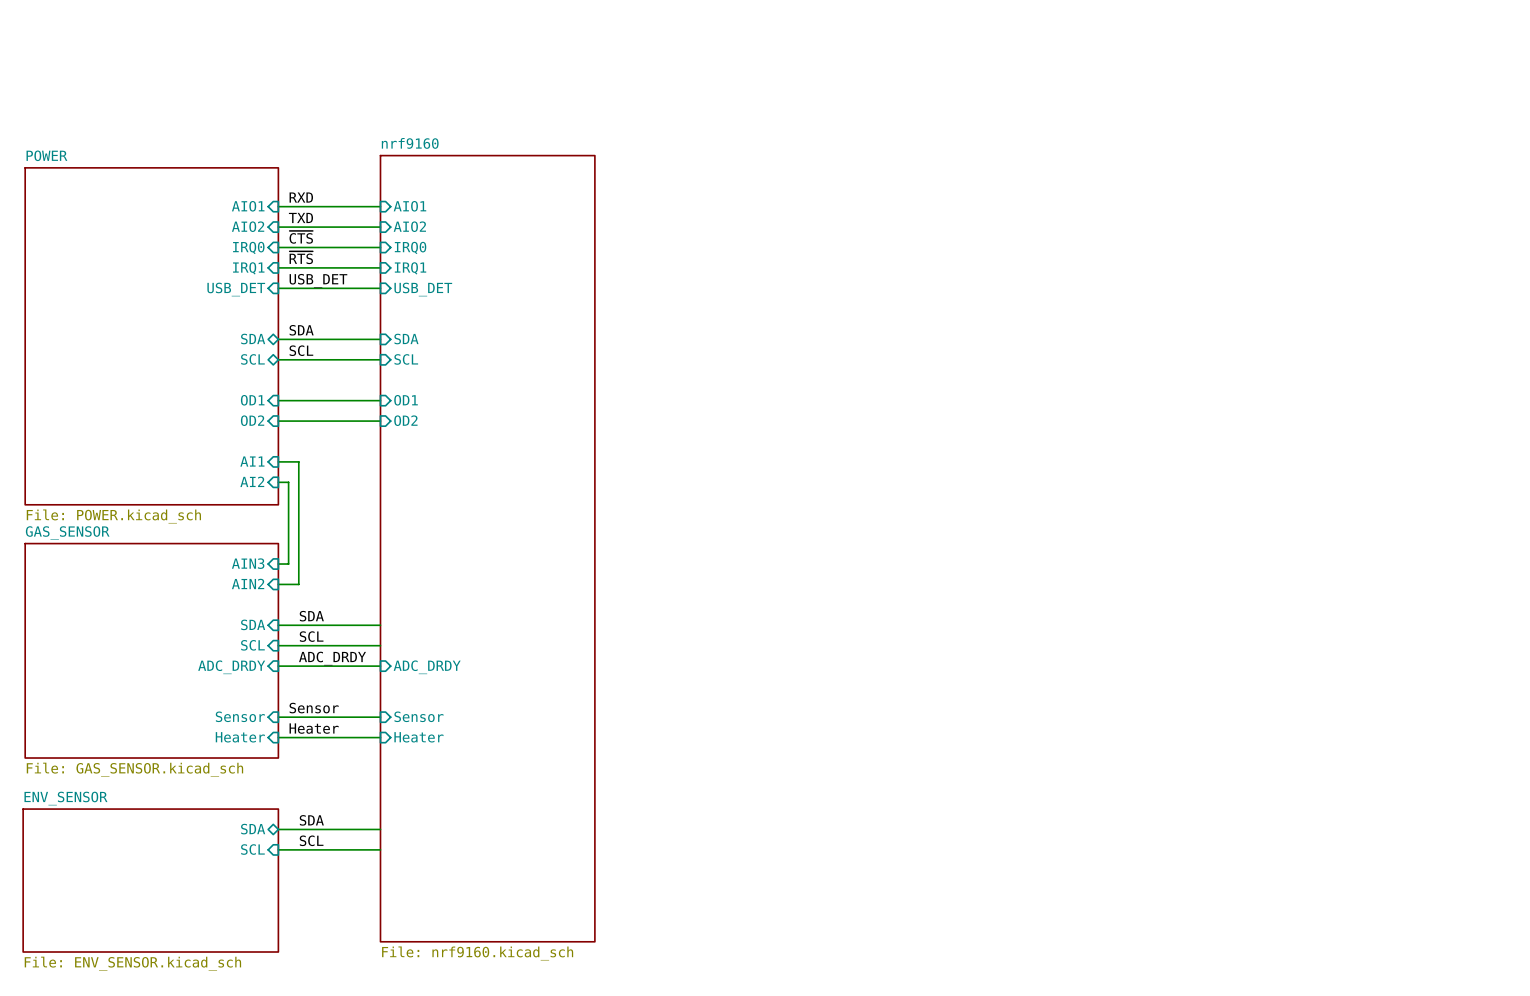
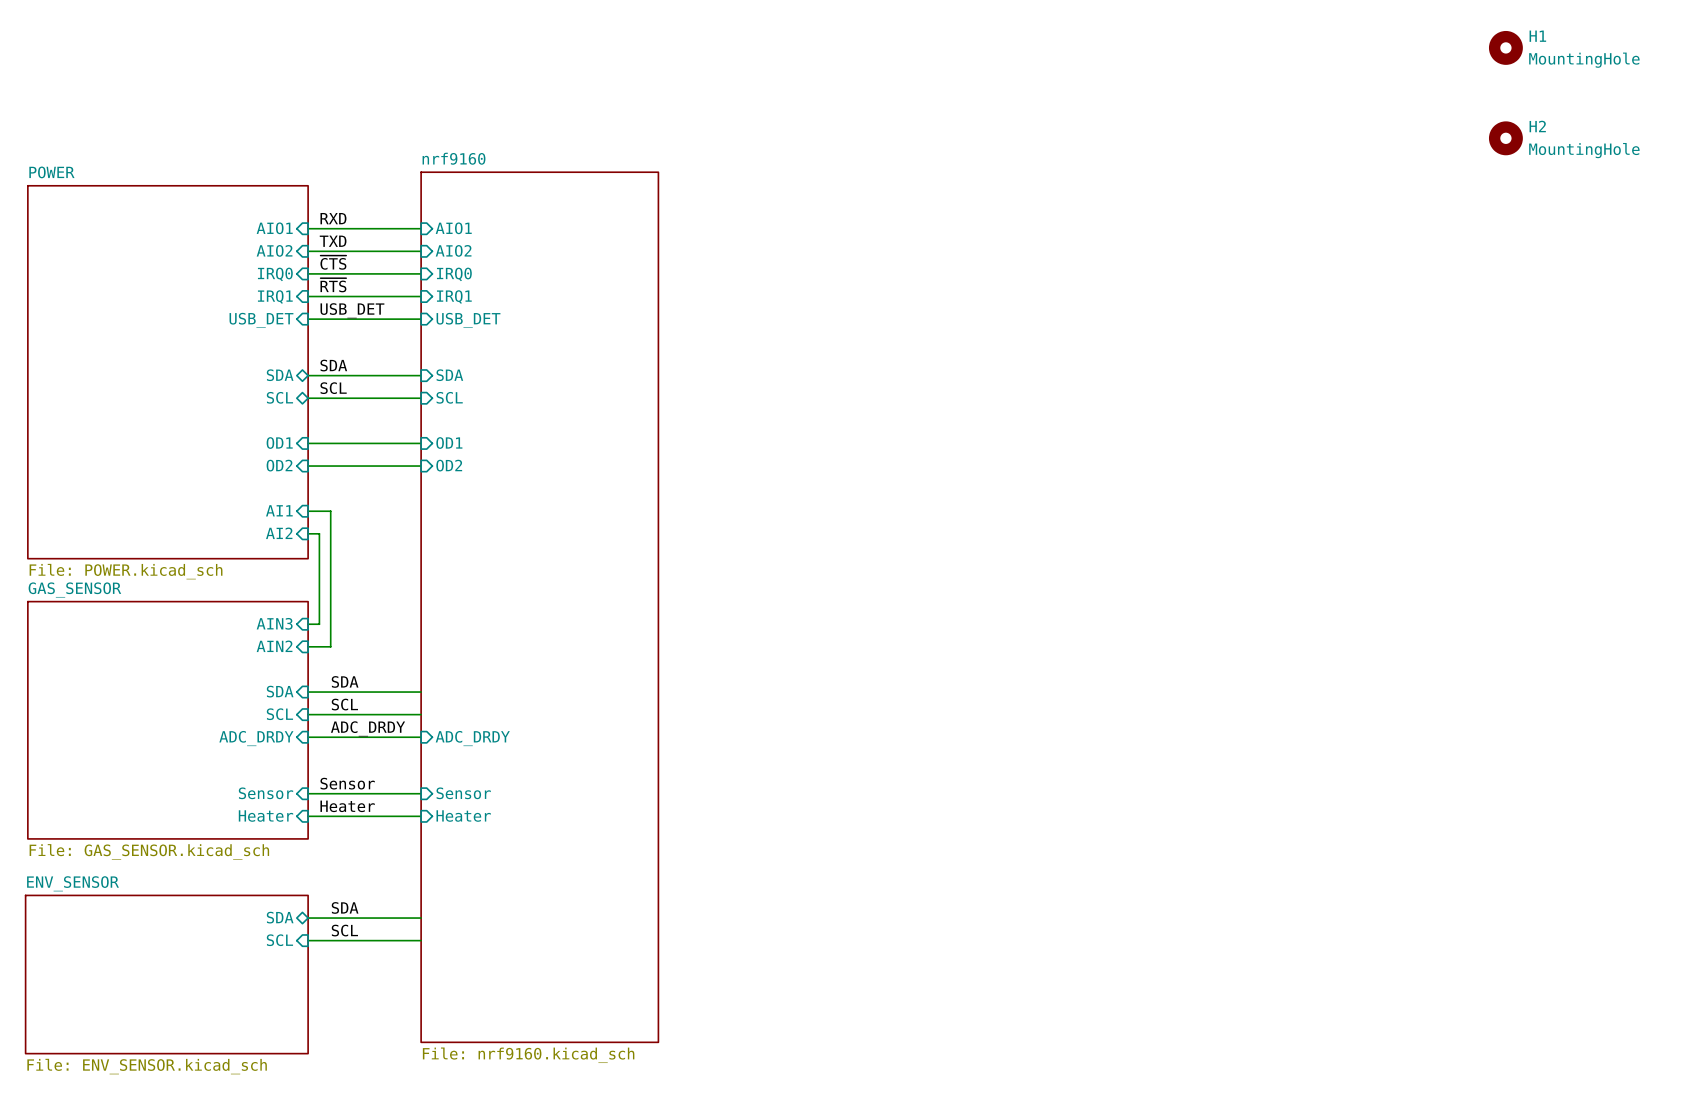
H1: none -> MountingHole (1505, 47)
H2: none -> MountingHole (1505, 138)

